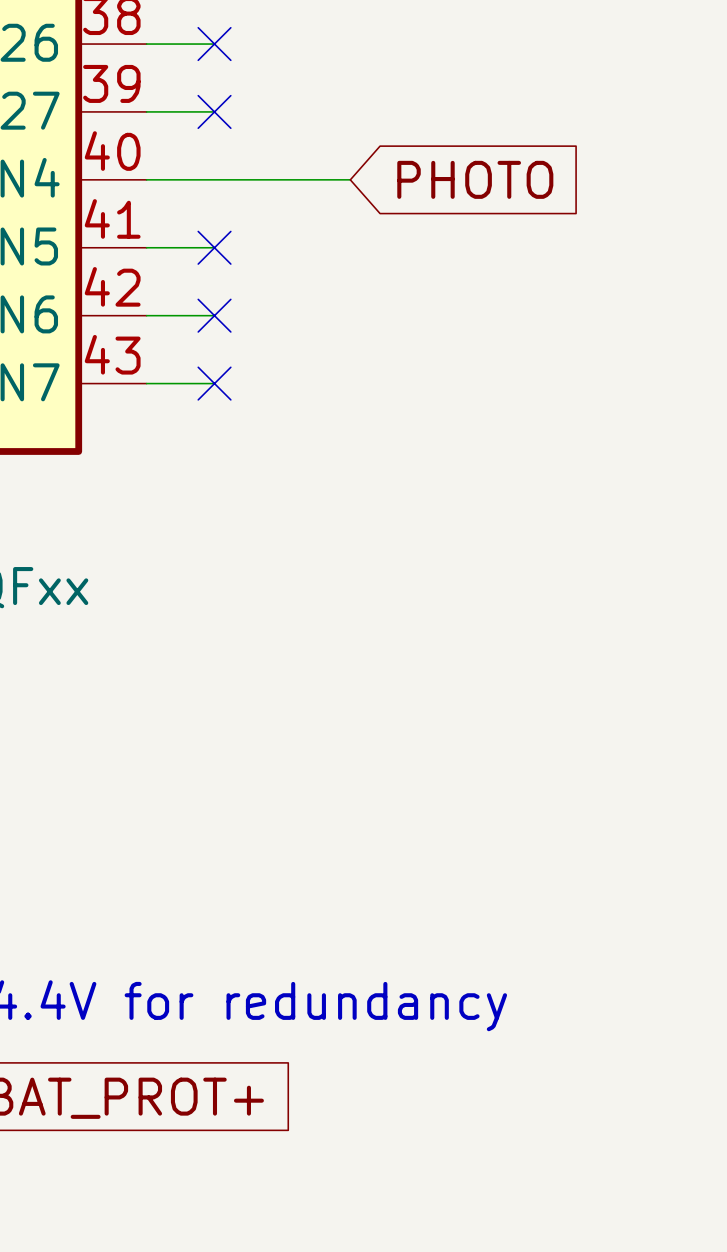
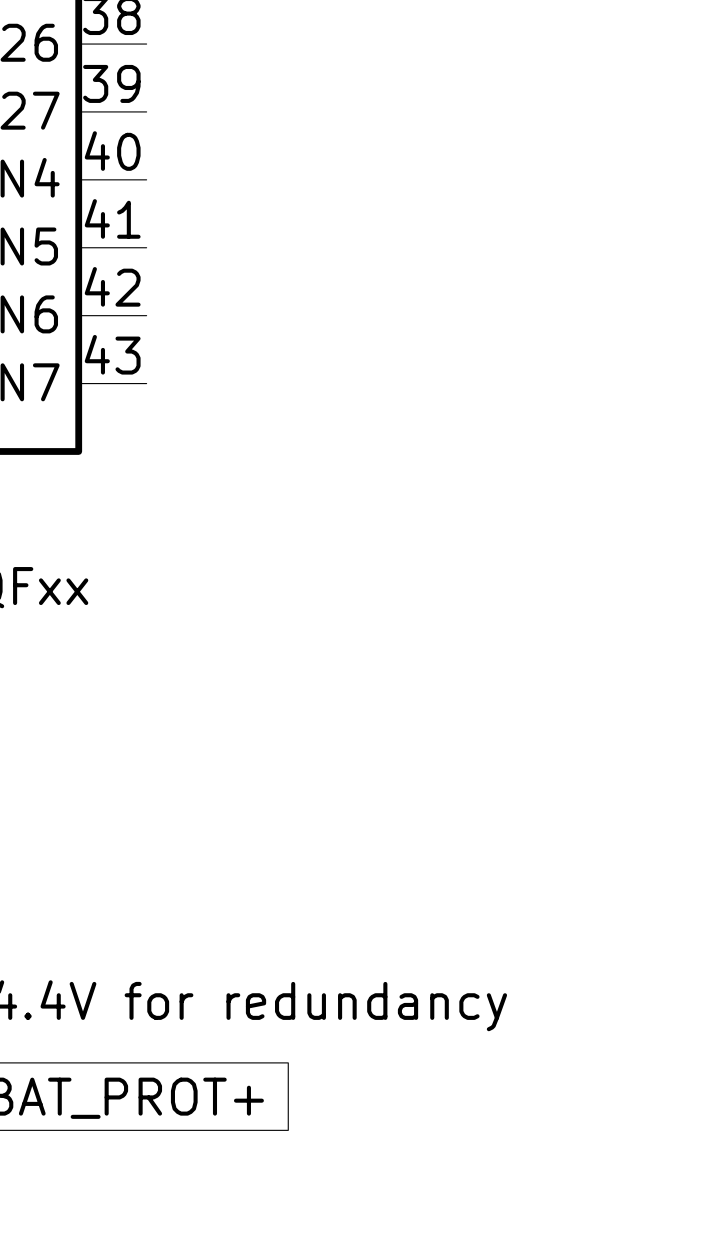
wire: (146, 44) (214, 44) -> none
no-connect mark: (214, 44) -> none
wire: (146, 111) (214, 111) -> none
no-connect mark: (214, 111) -> none
wire: (146, 179) (350, 179) -> none
global label: PHOTO (475, 179) -> none
wire: (146, 247) (214, 247) -> none
no-connect mark: (214, 247) -> none
wire: (146, 315) (214, 315) -> none
no-connect mark: (214, 315) -> none
wire: (146, 383) (214, 383) -> none
no-connect mark: (214, 383) -> none

